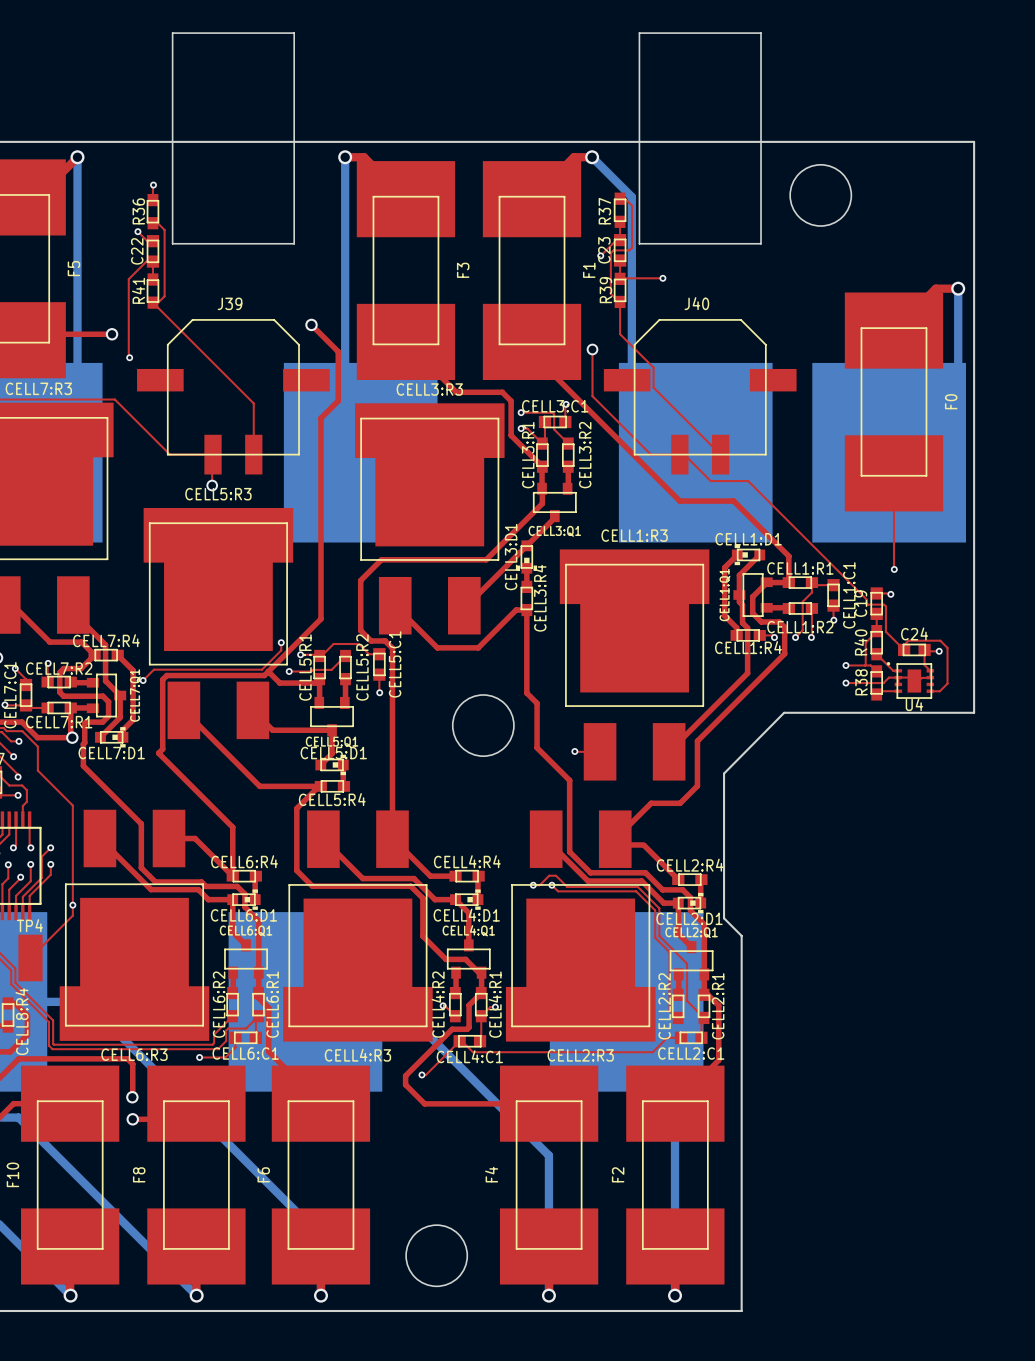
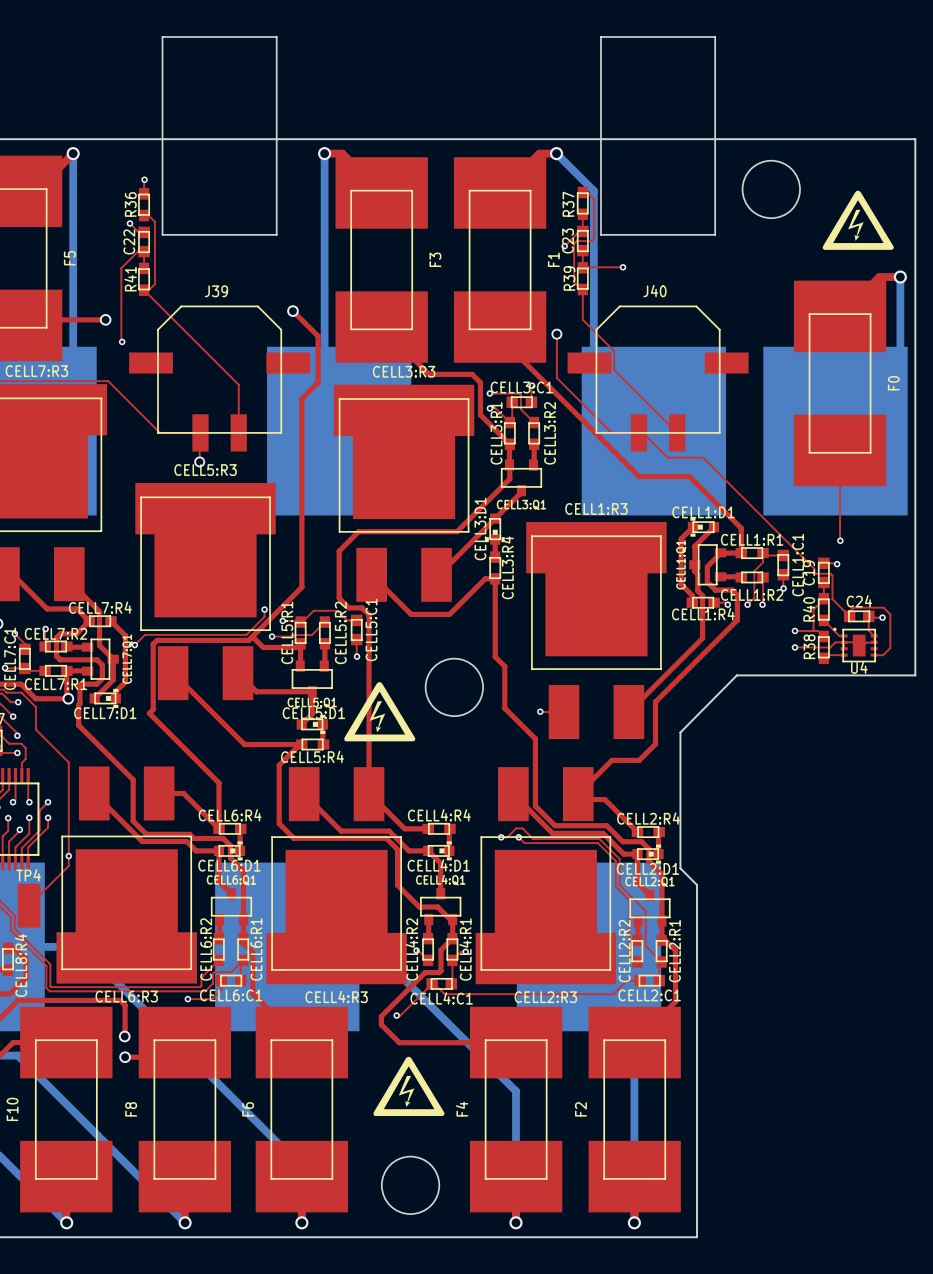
drawing: none -> [822, 190, 894, 250]
drawing: none -> [344, 682, 416, 742]
drawing: none -> [373, 1056, 445, 1117]

